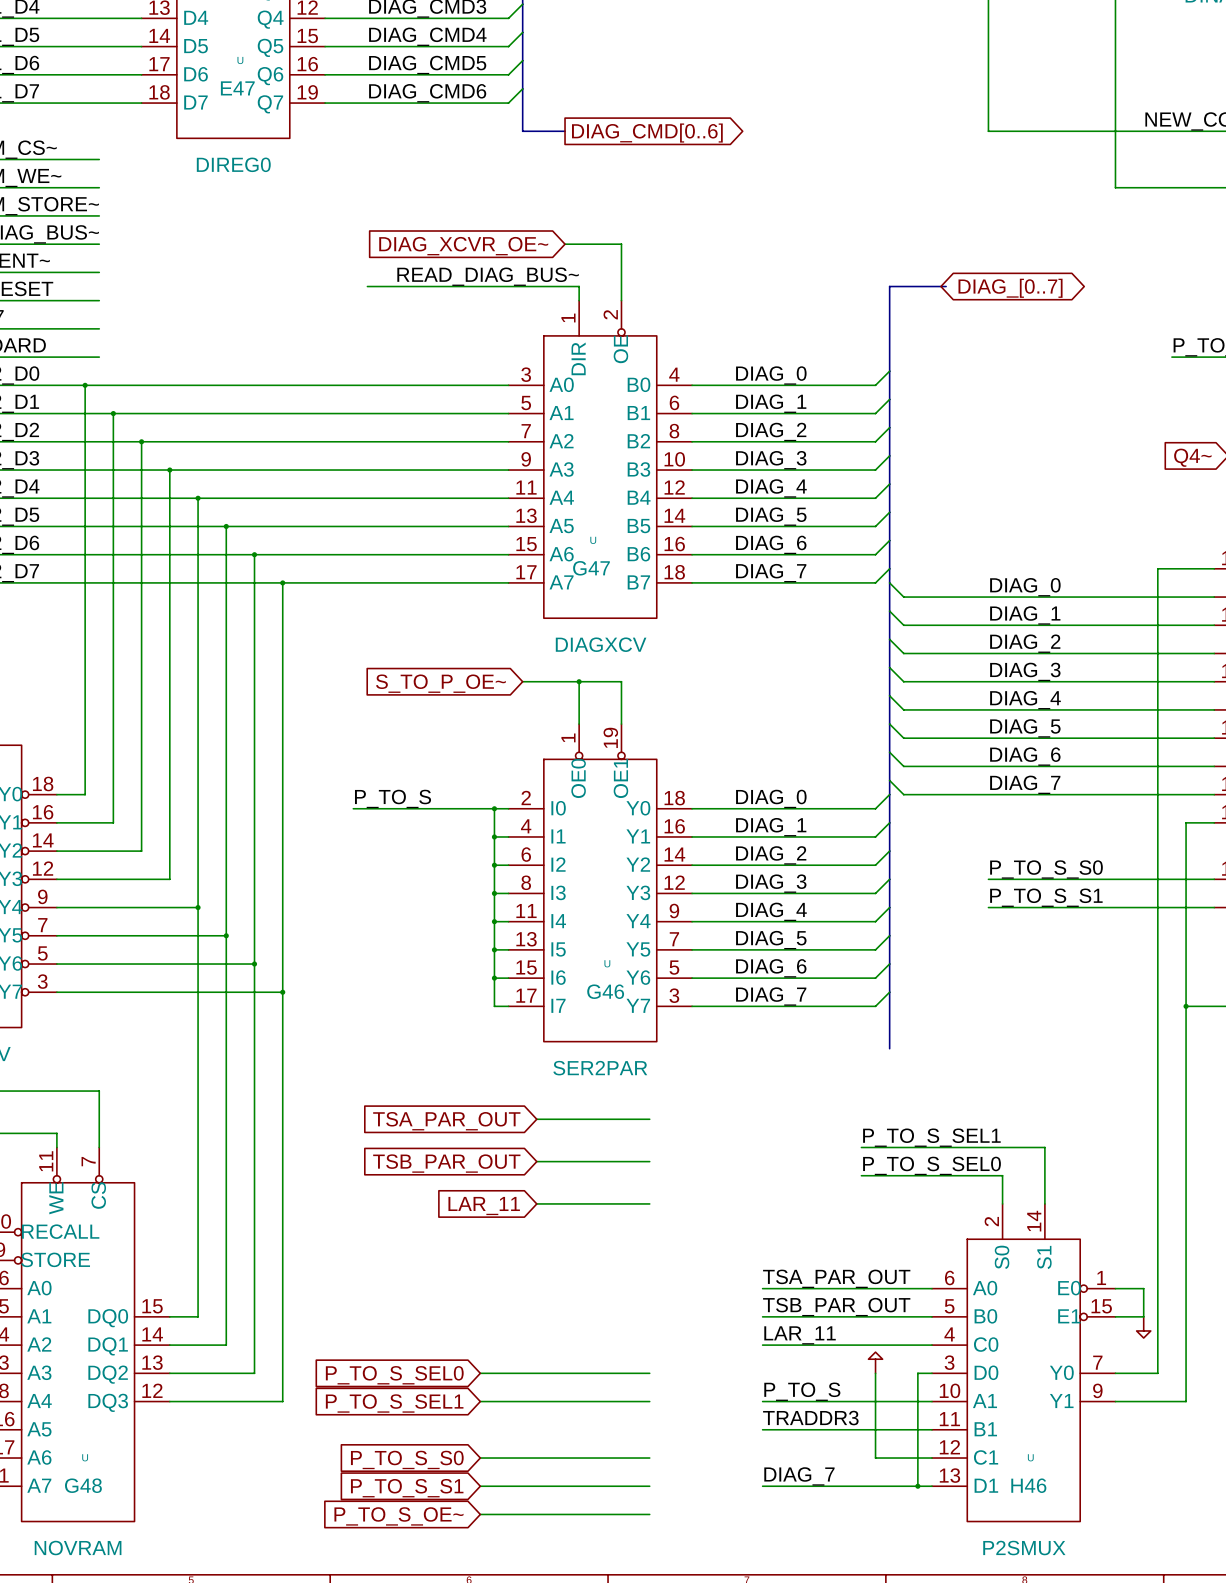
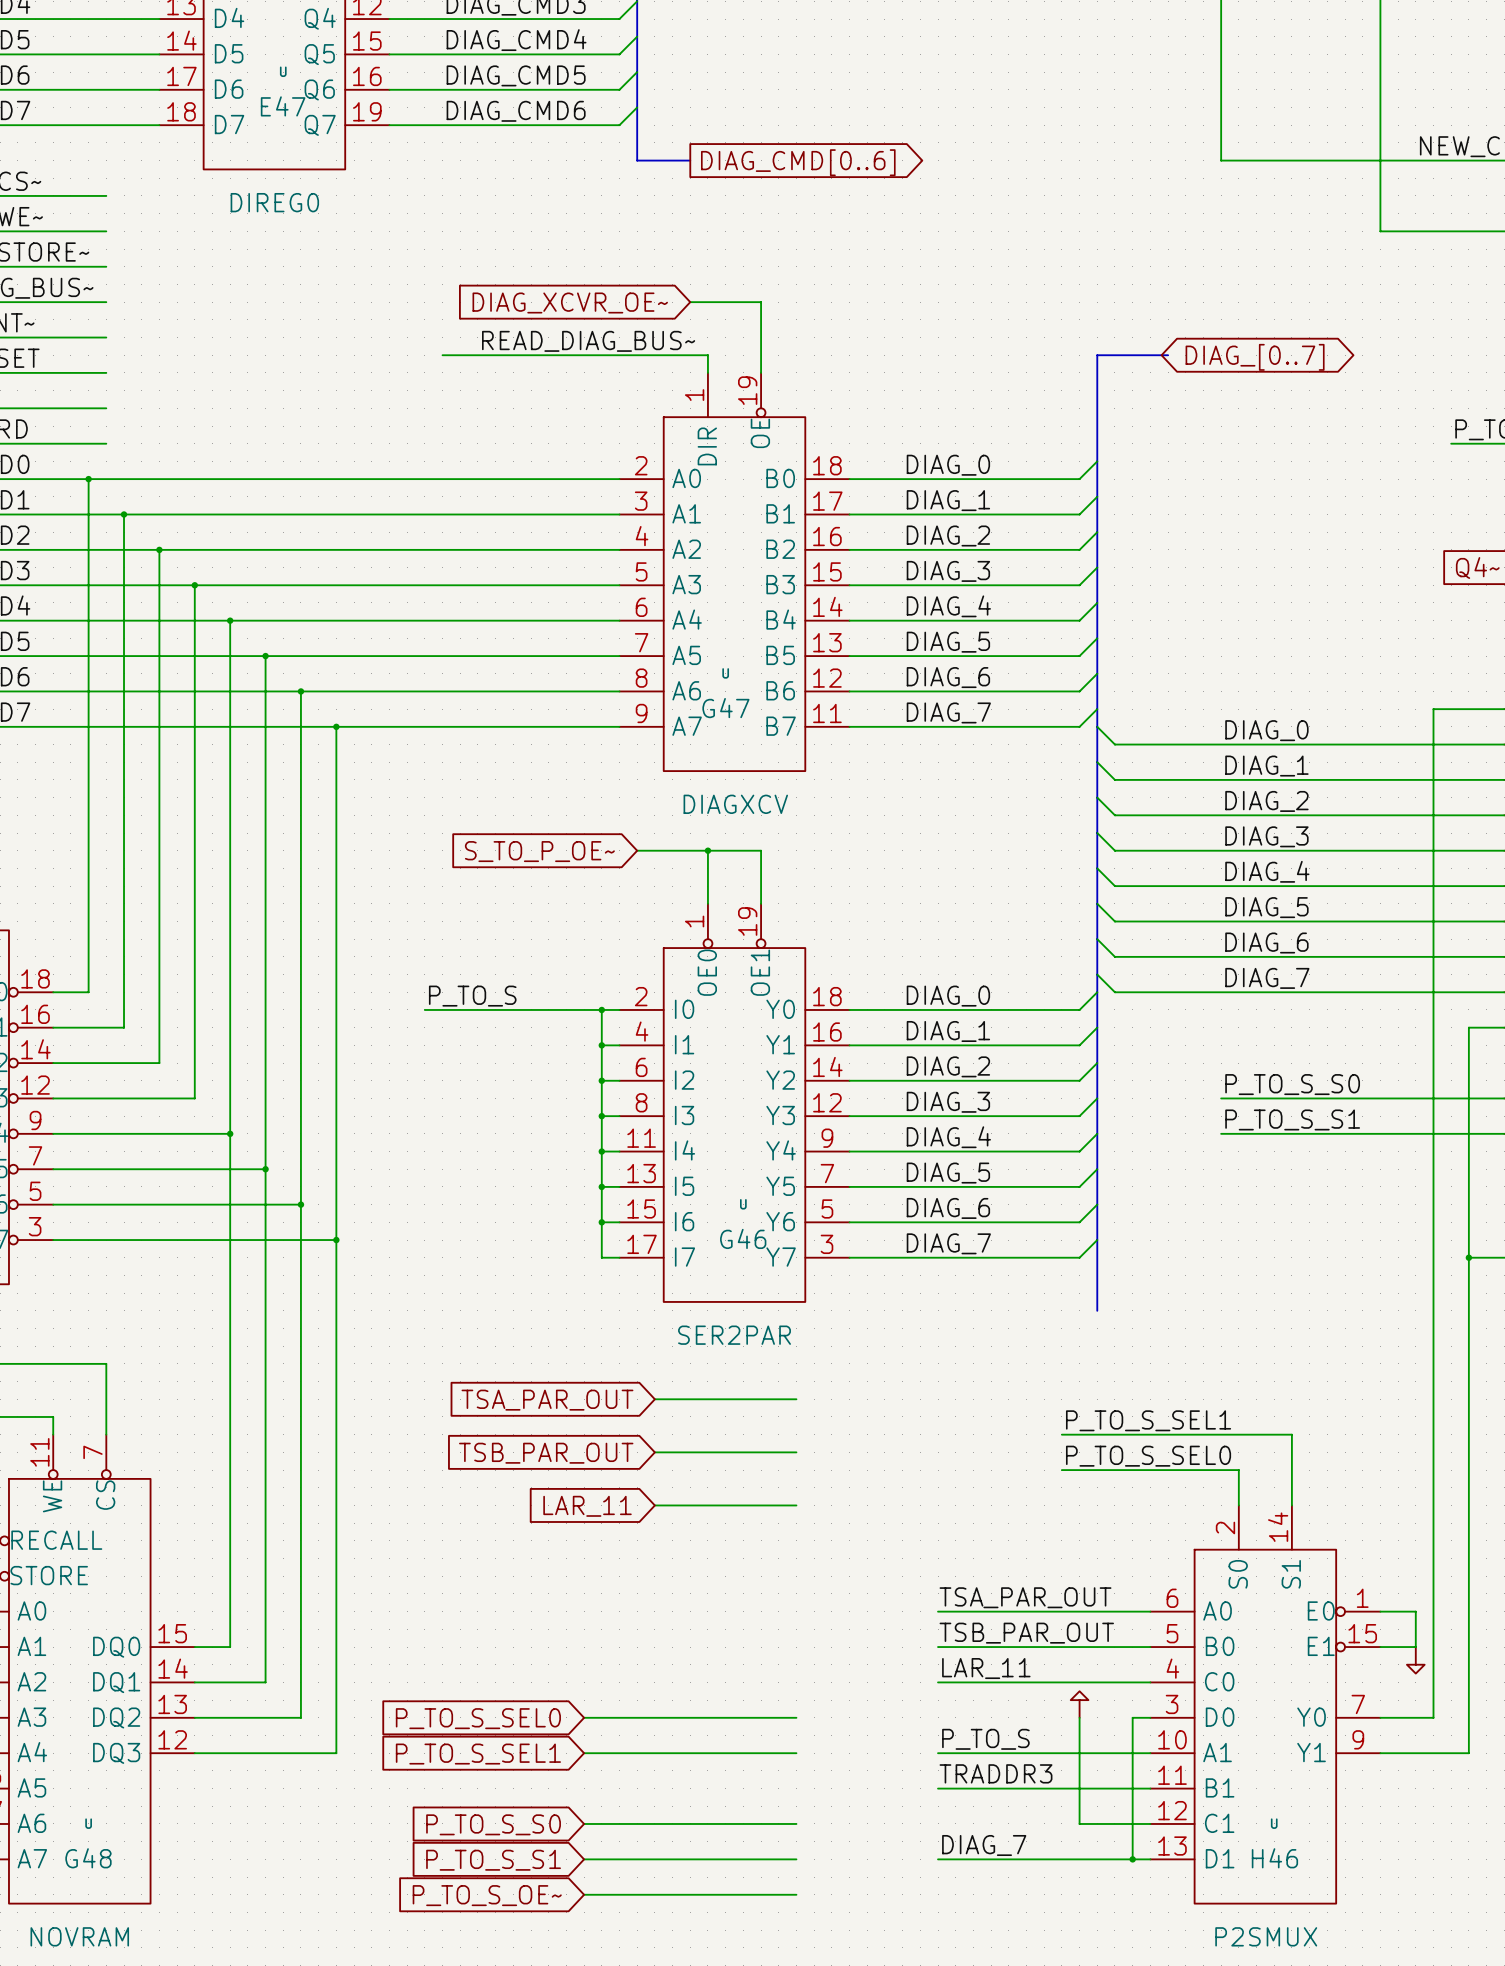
U symbol: [508, 300, 693, 619] -> [619, 372, 850, 772]

